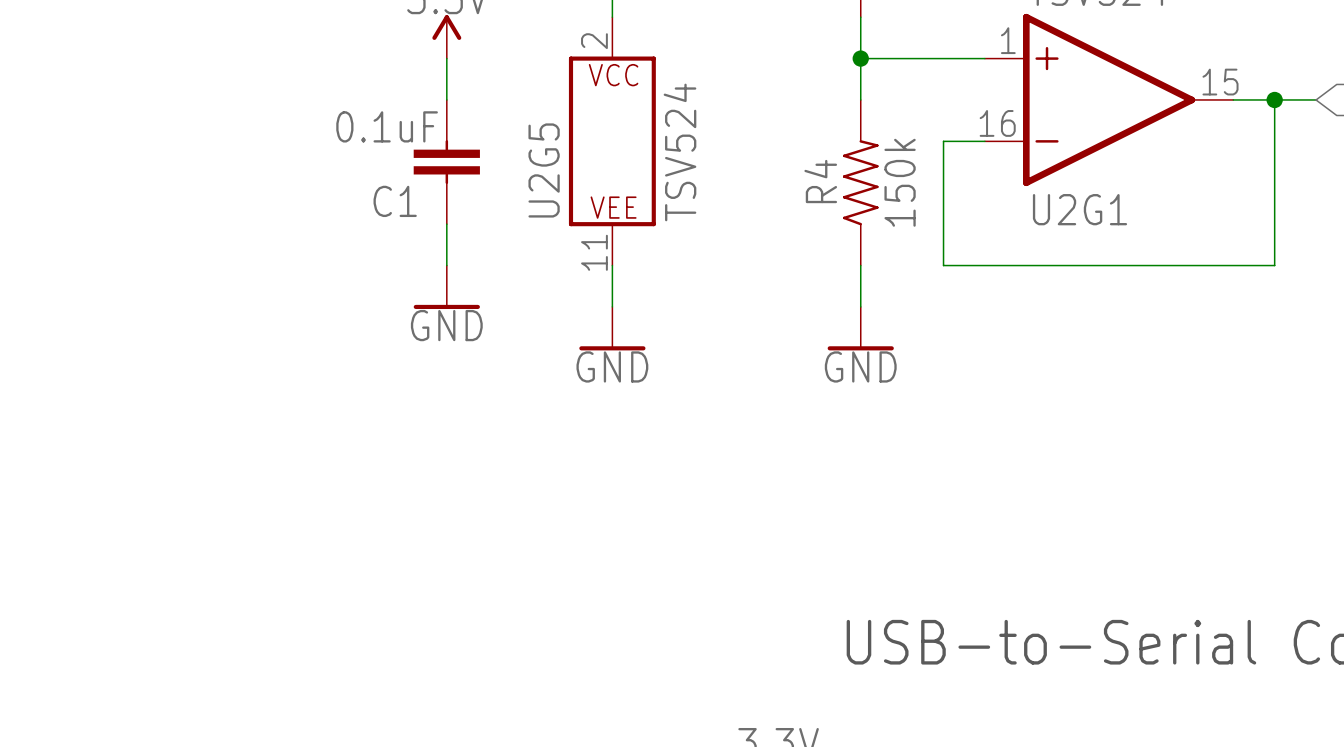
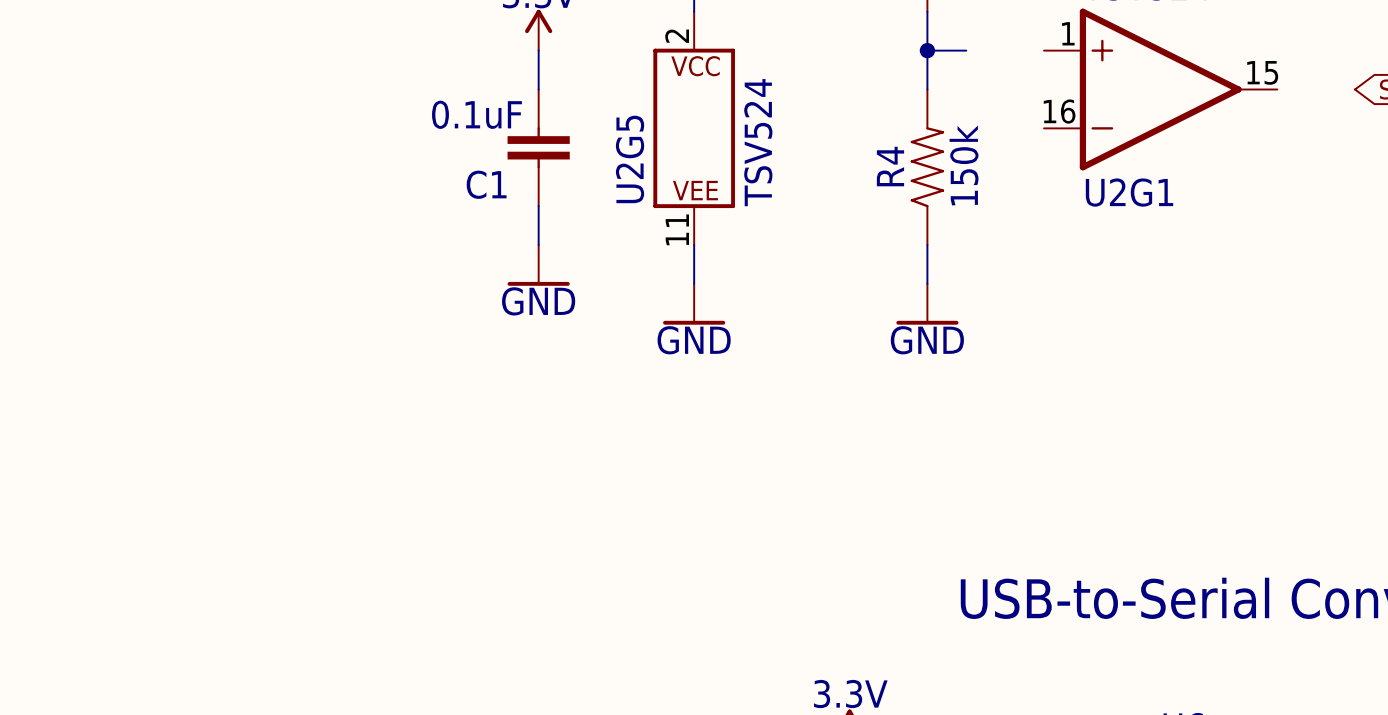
wire: (902, 58) (984, 58) -> none
wire: (1233, 99) (1316, 99) -> none
wire: (1274, 99) (1274, 265) (943, 265) (943, 141) (984, 141) -> none
junction: (1274, 99) -> none

